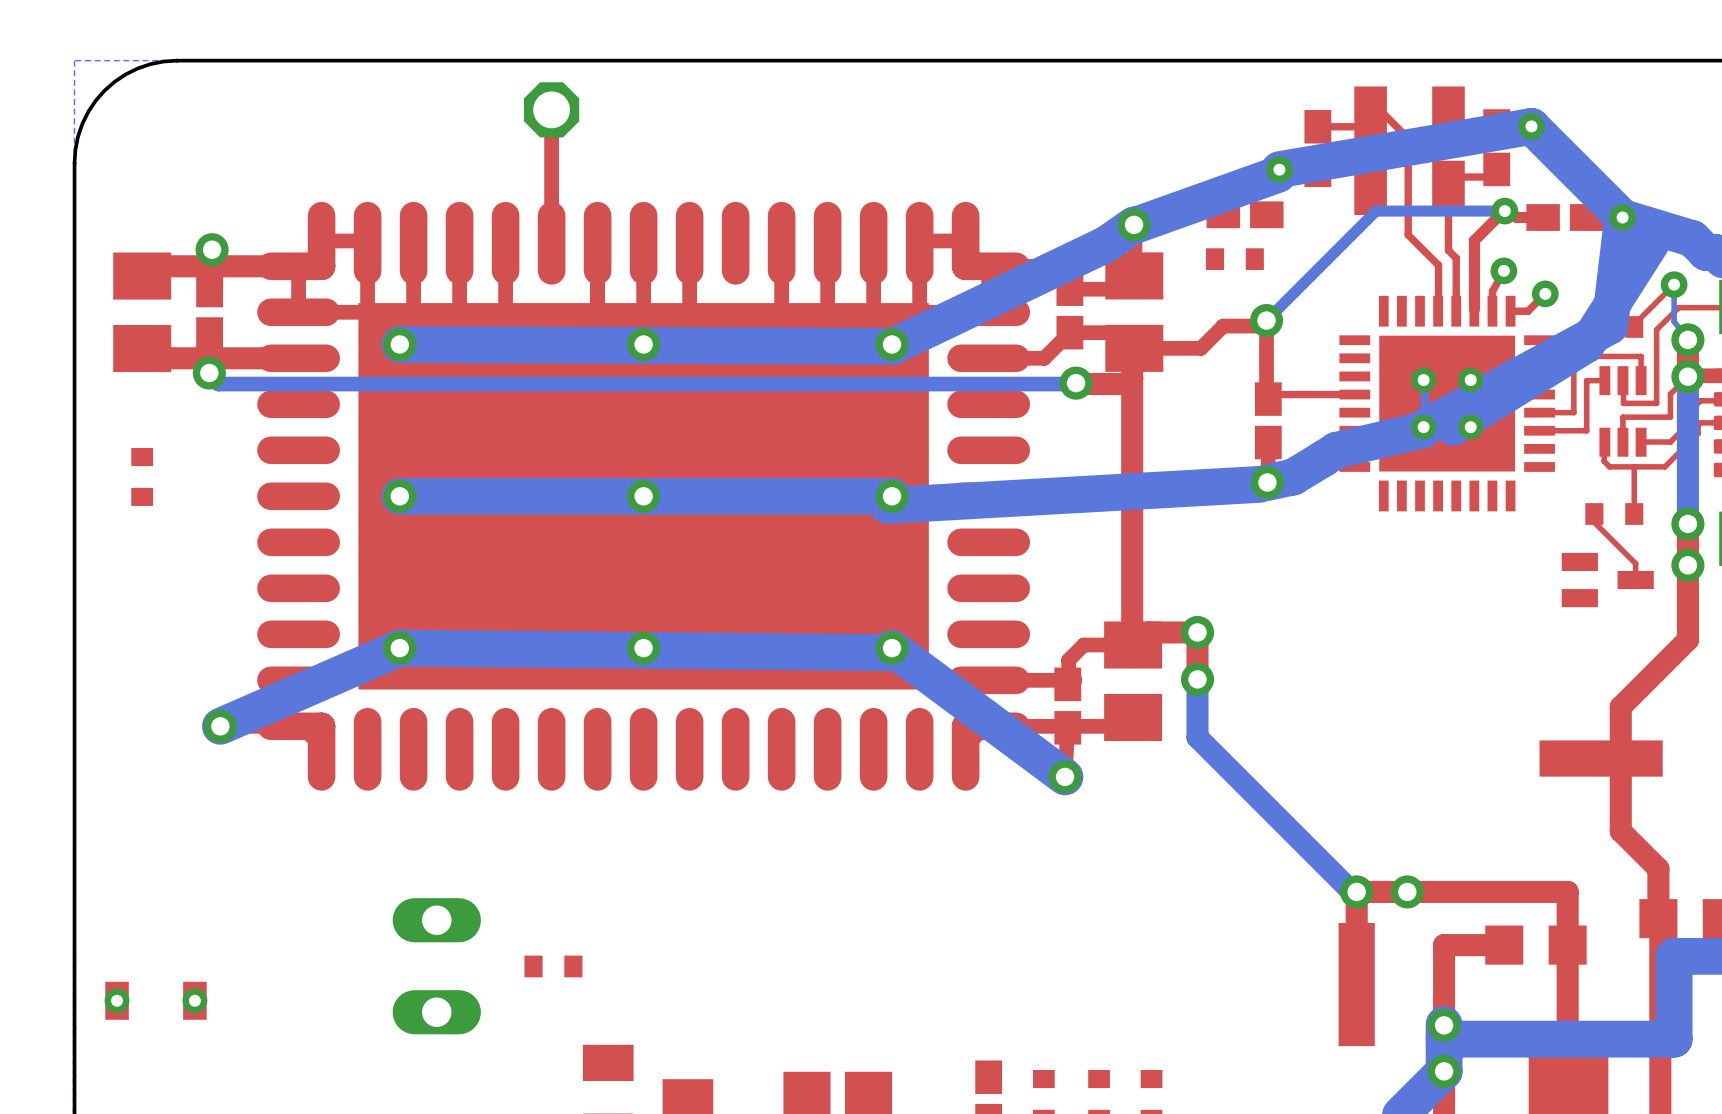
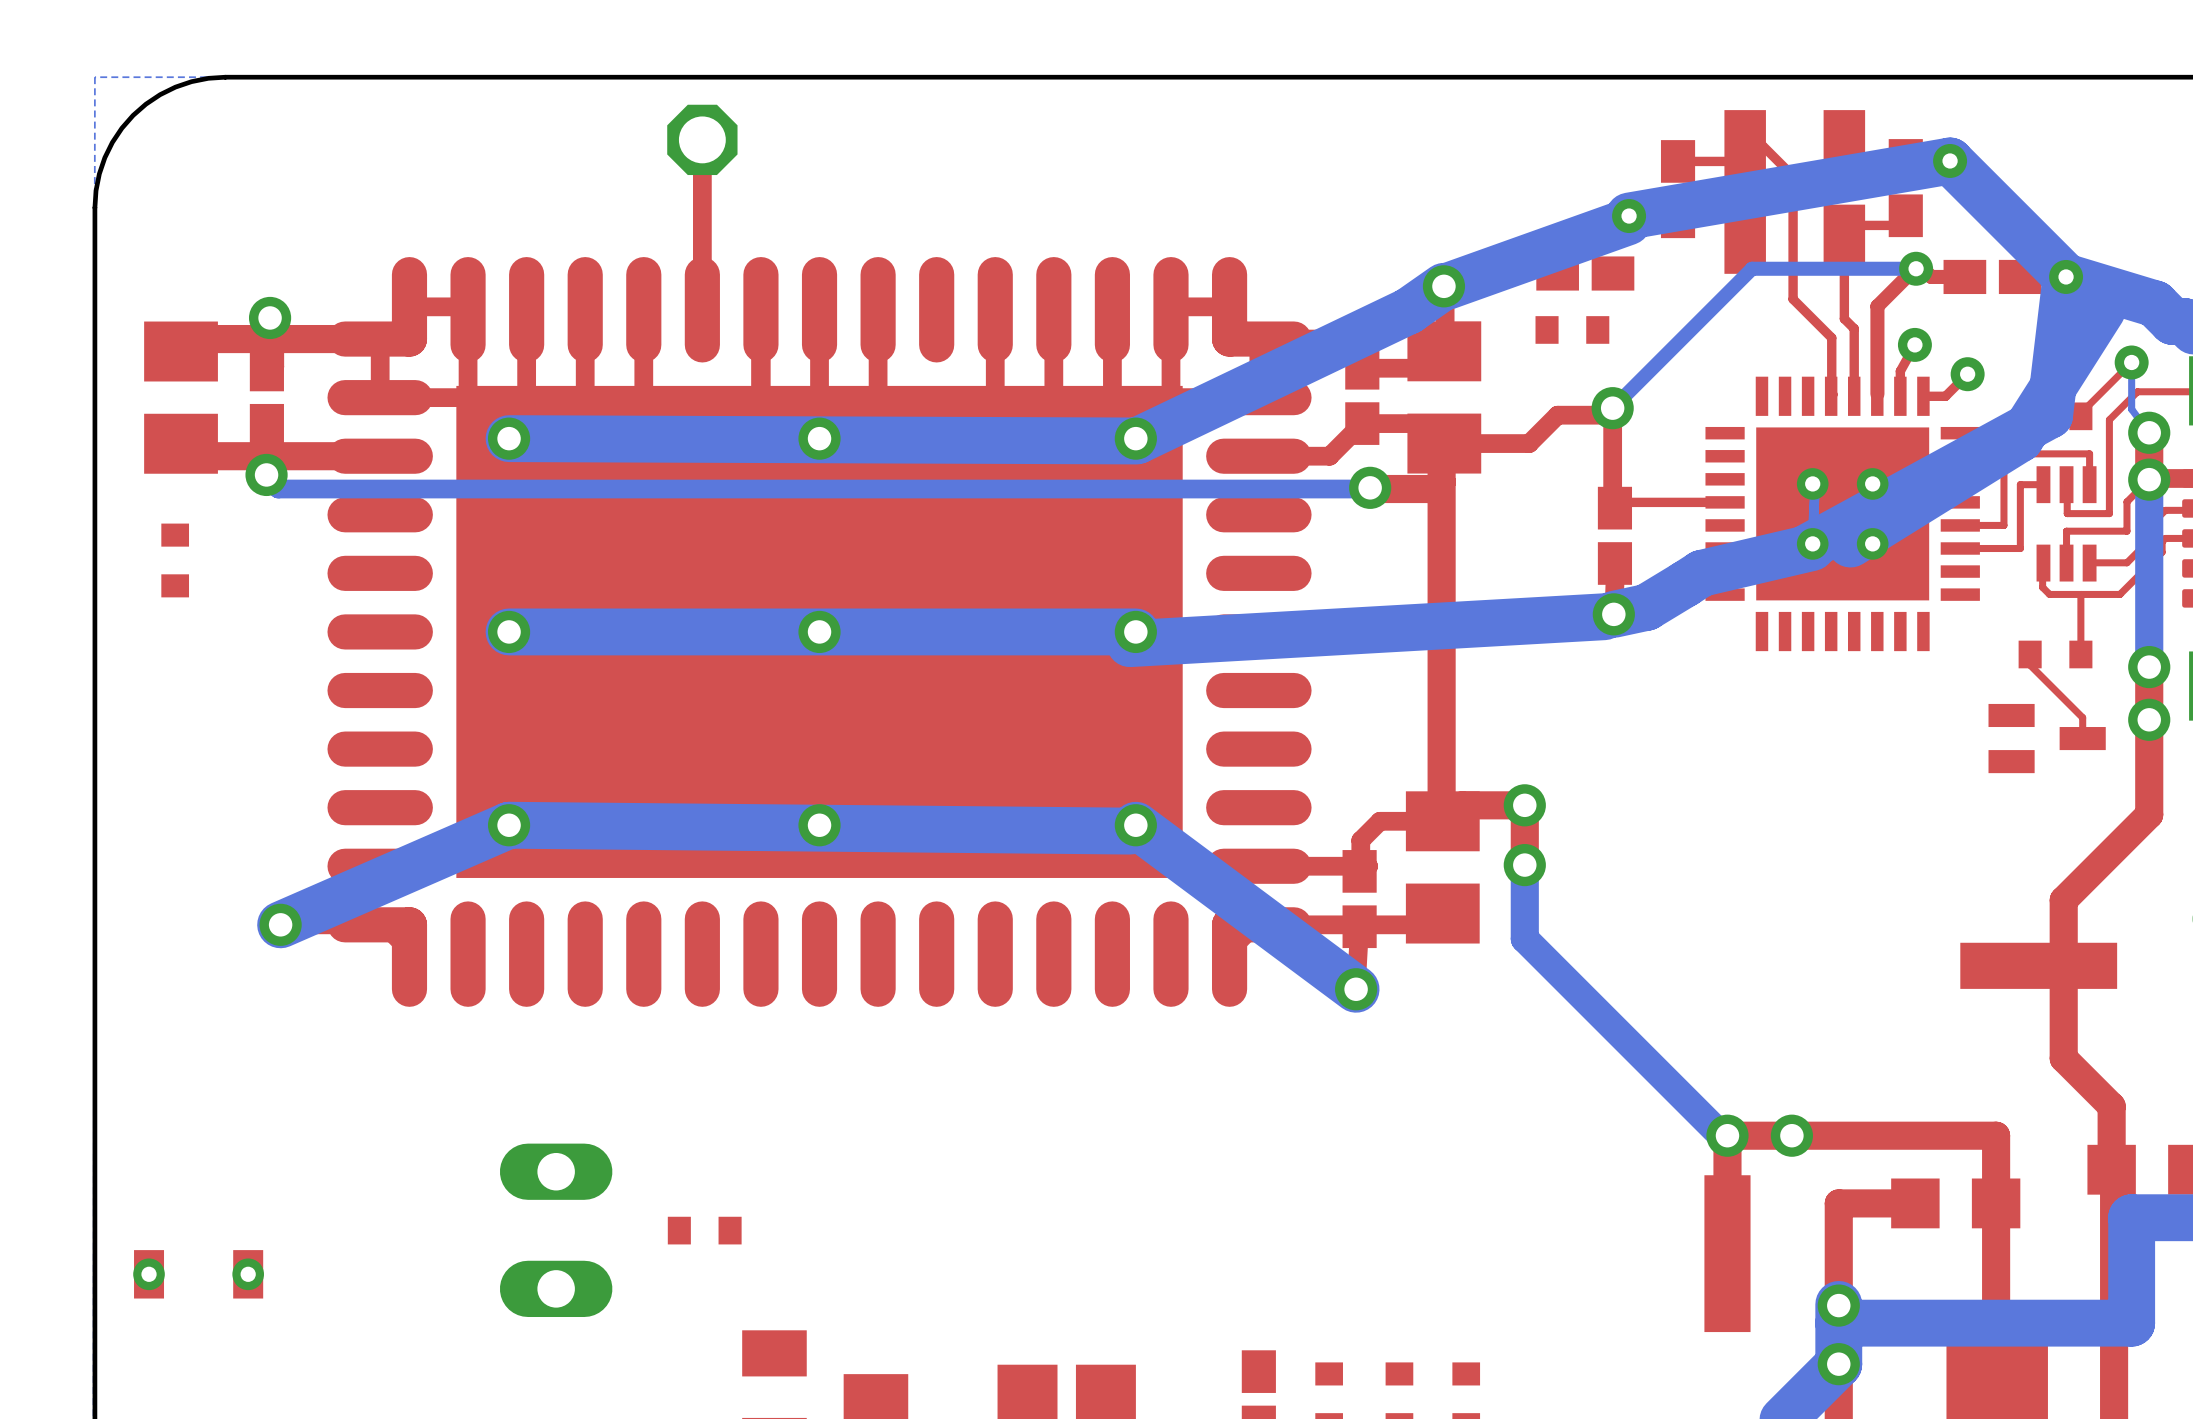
part position: (142, 476) -> (175, 560)

